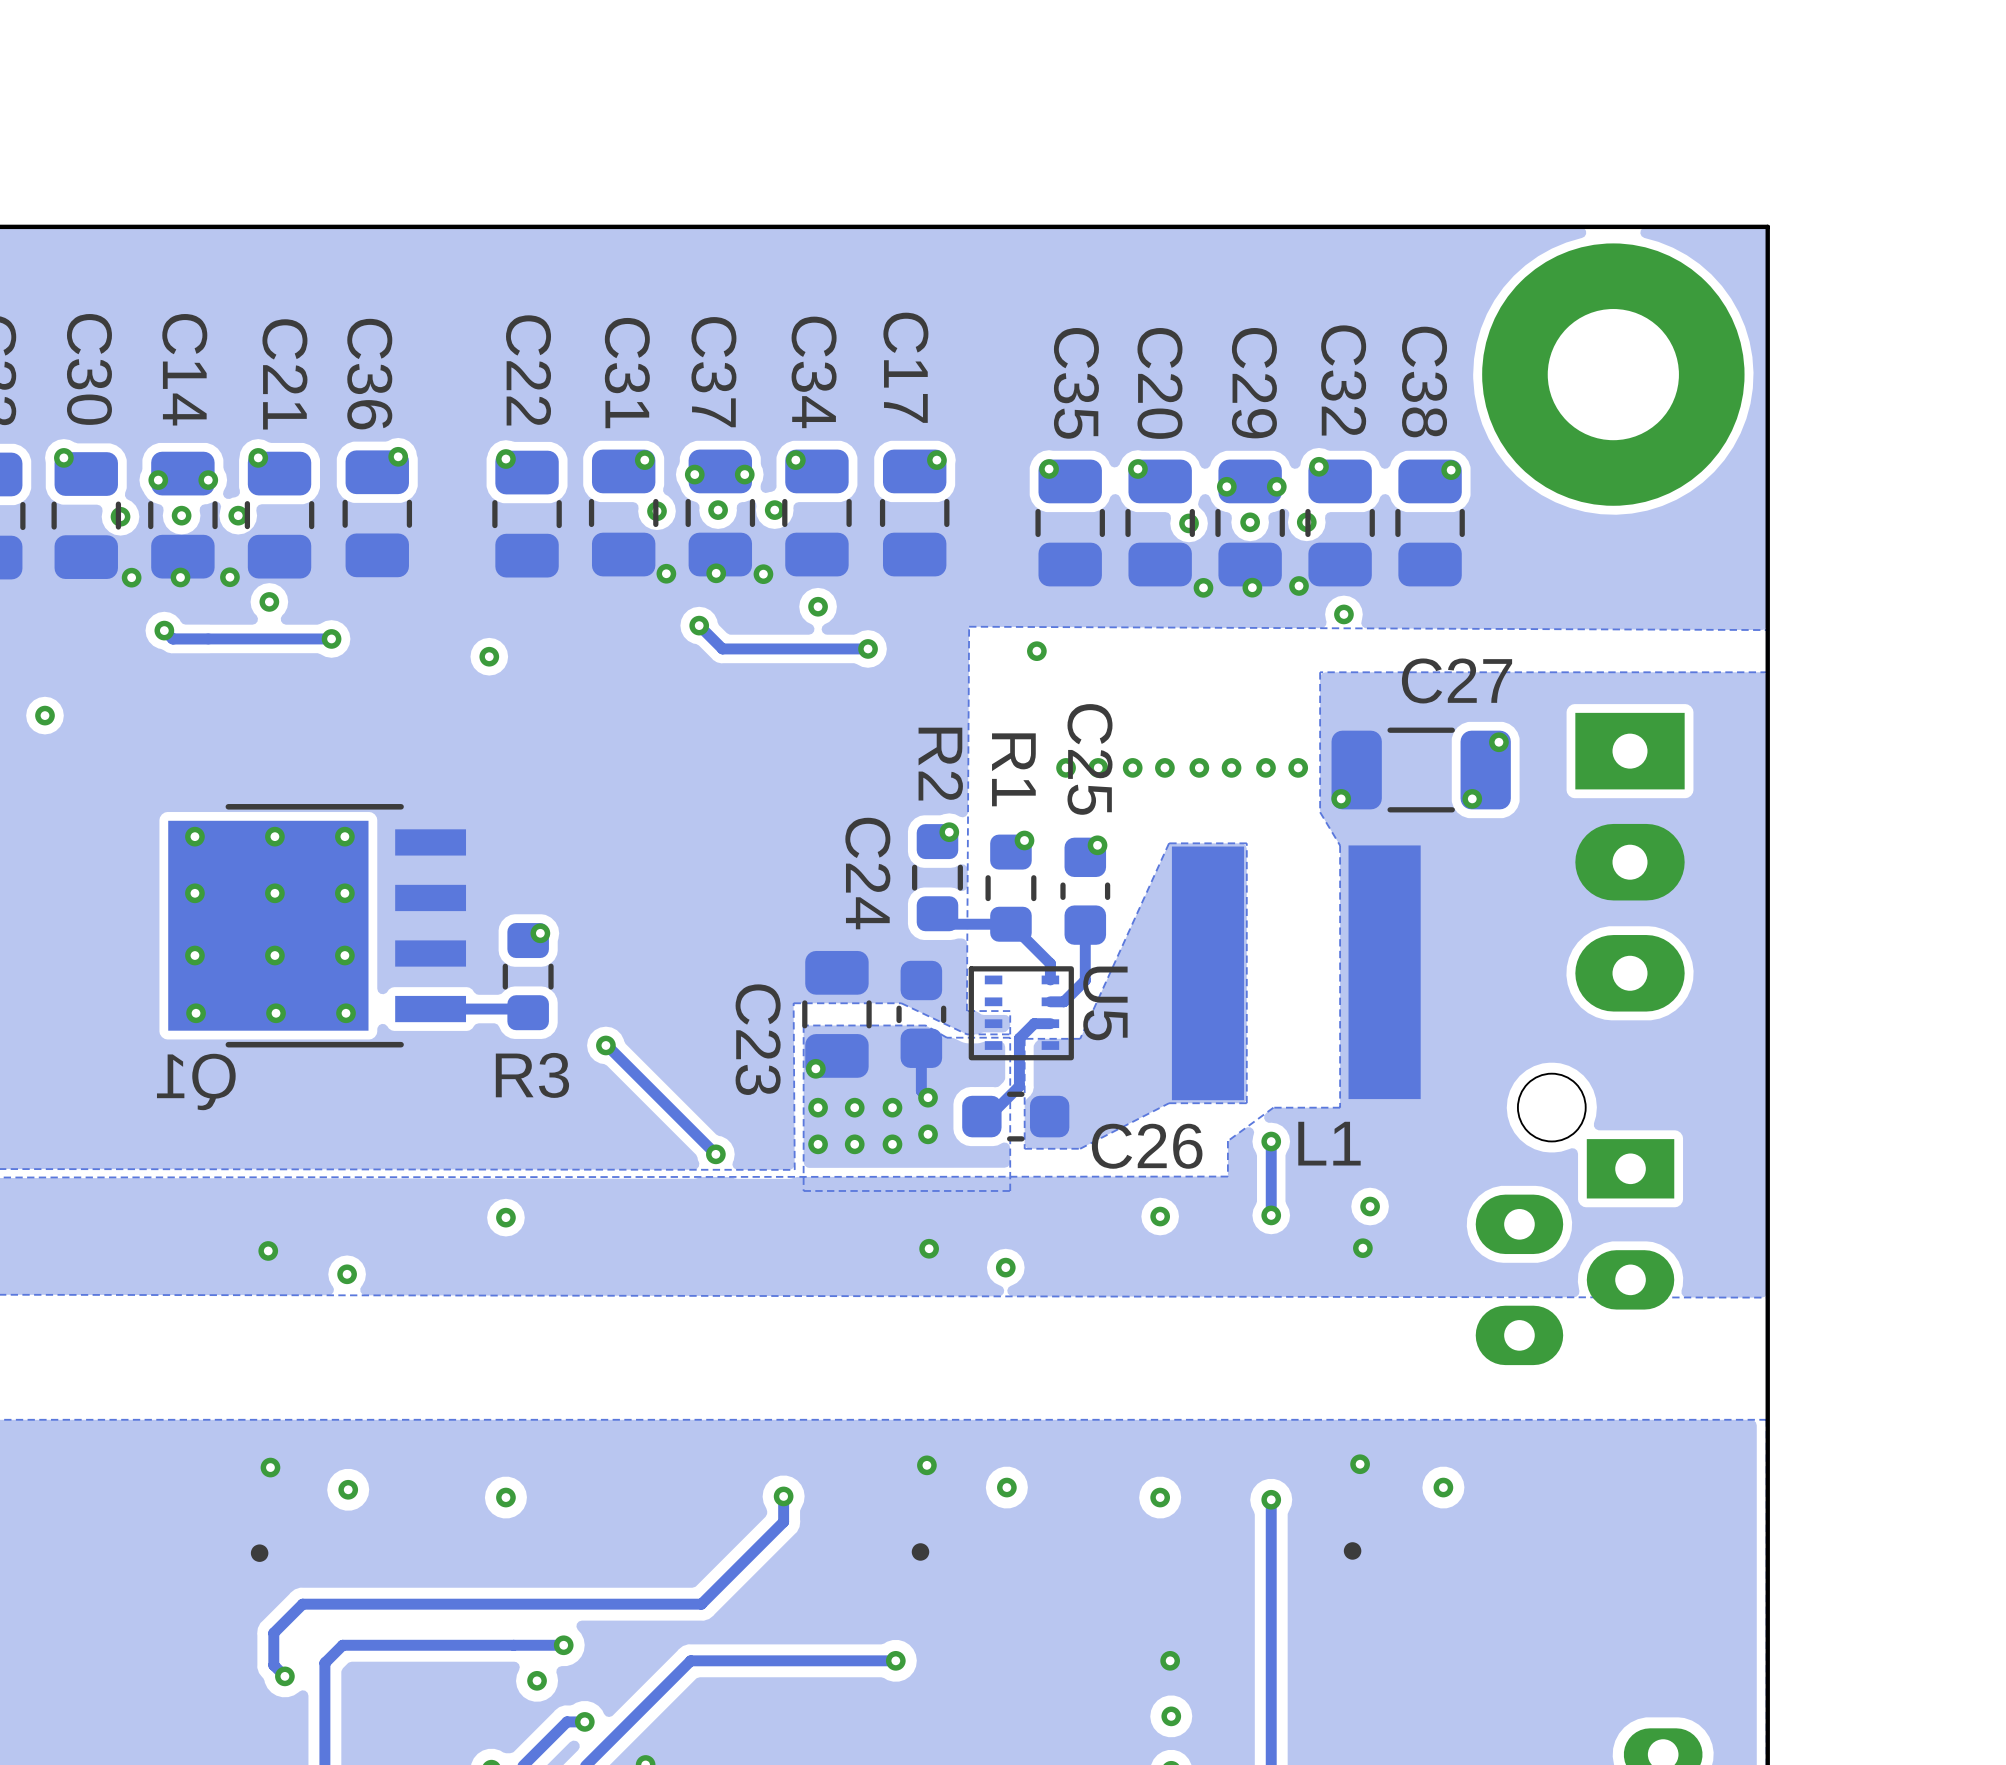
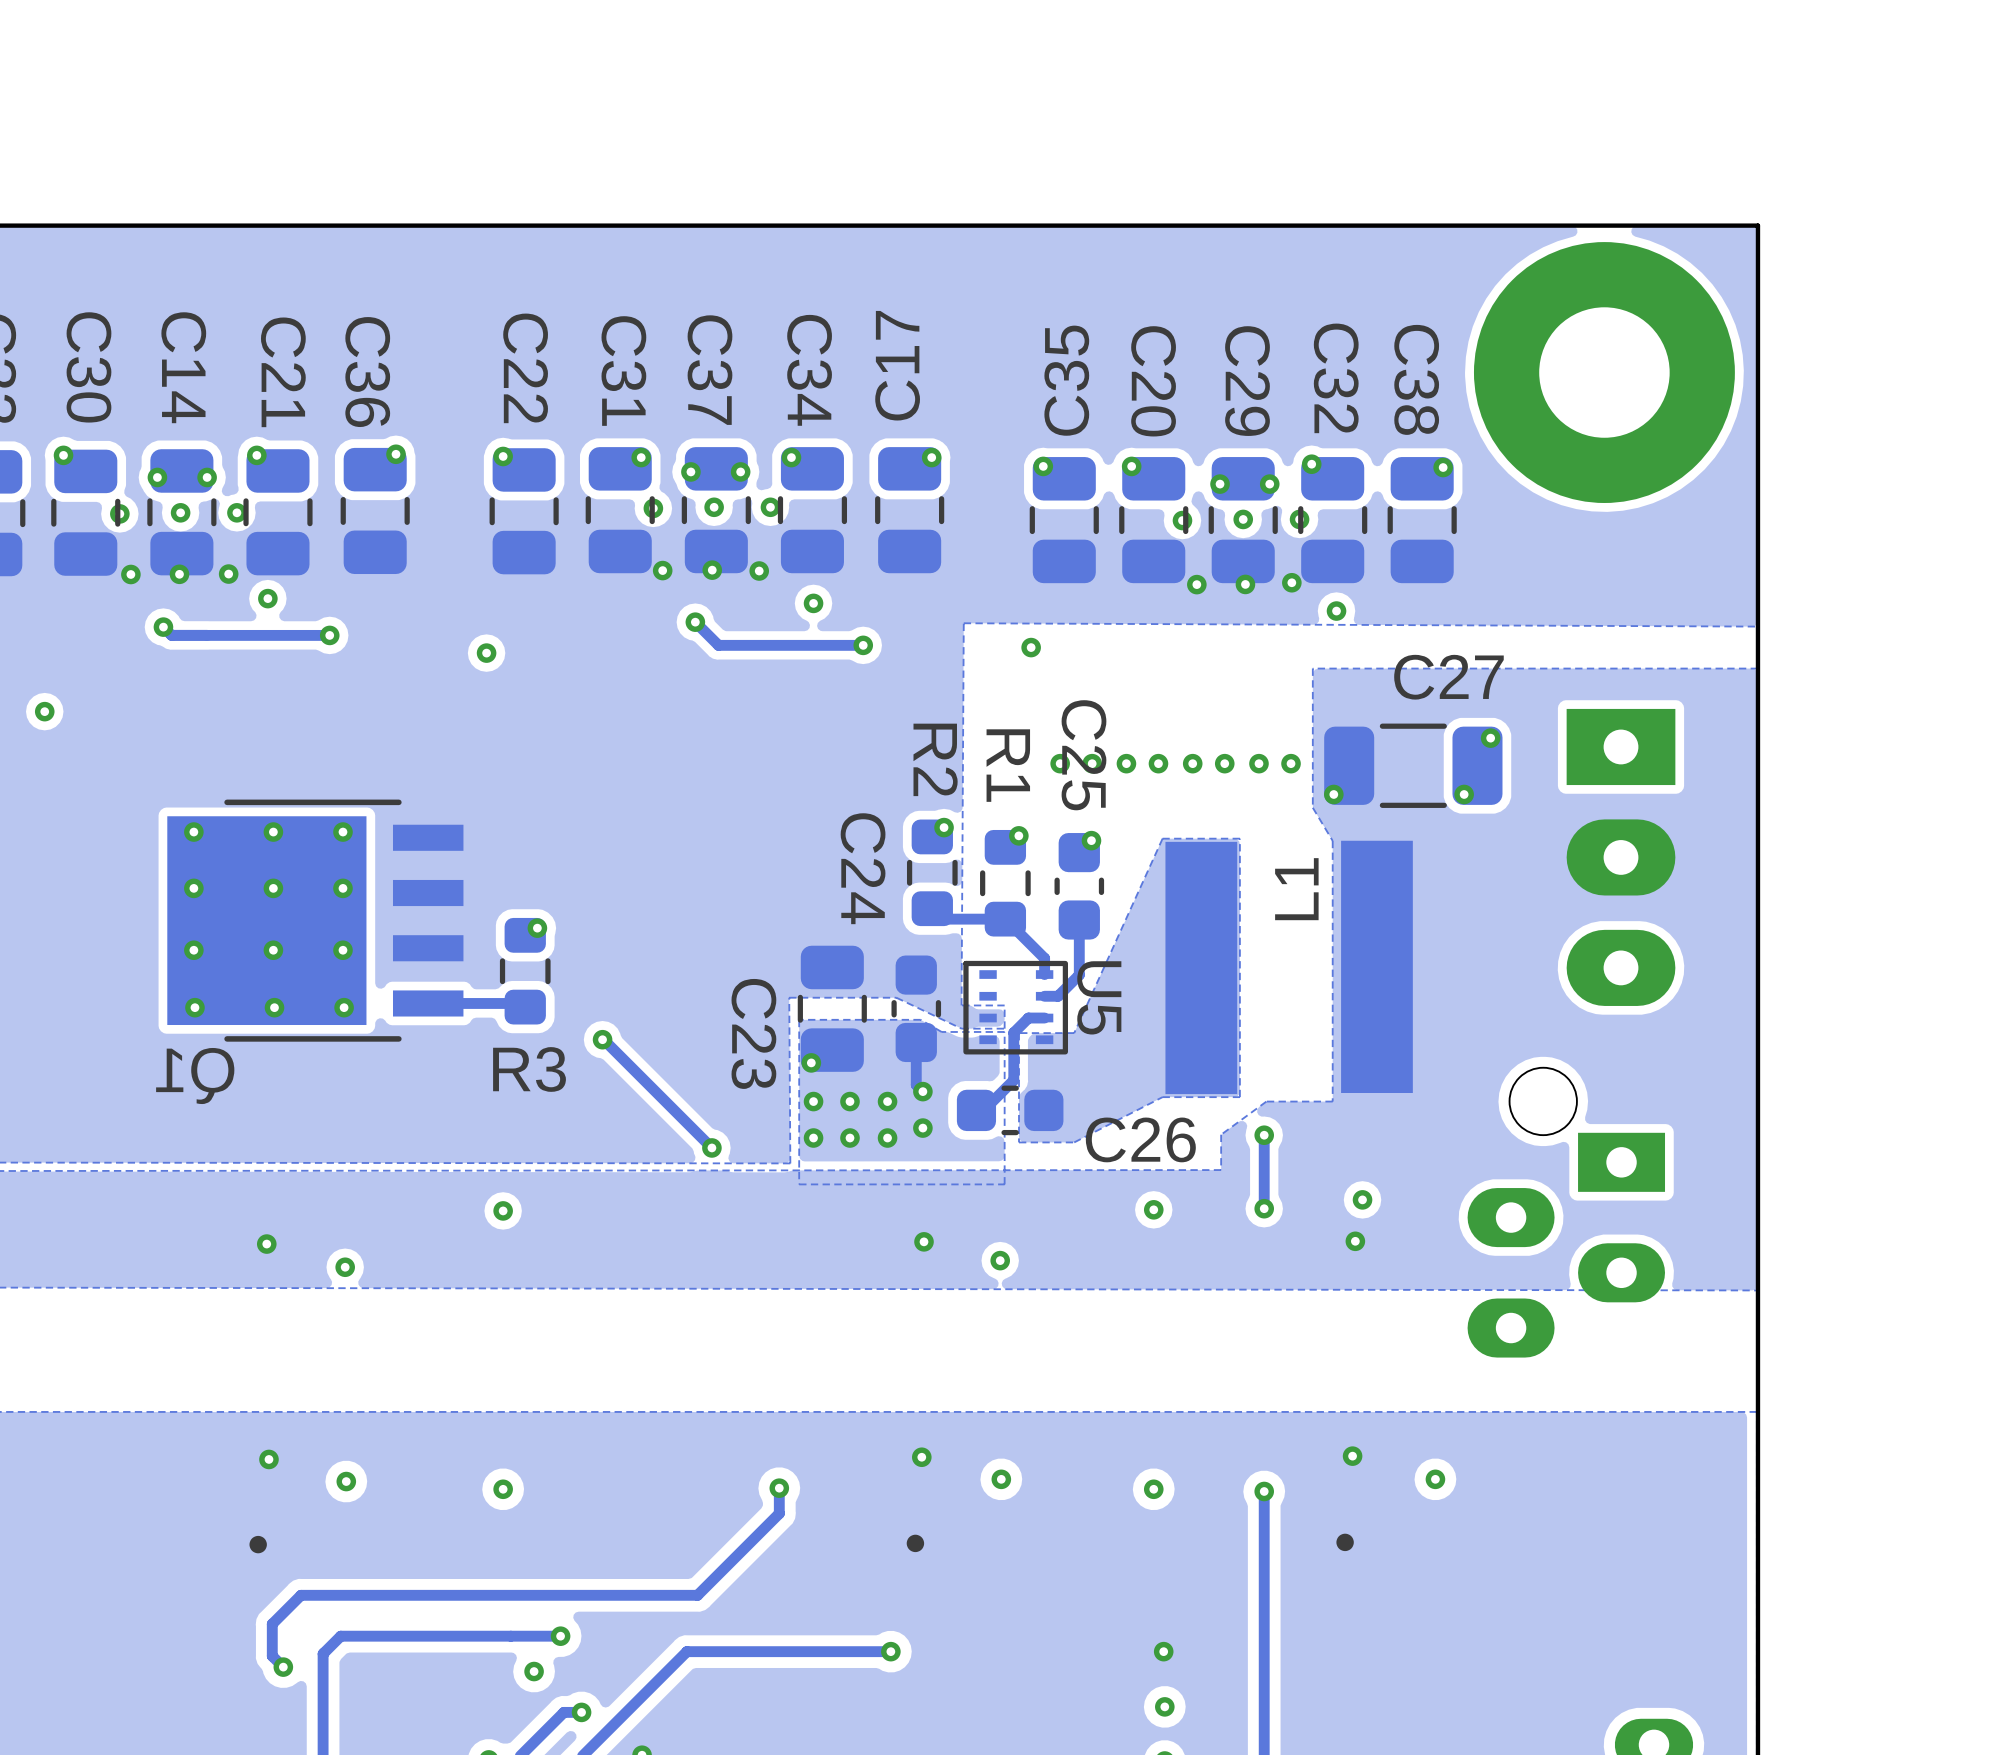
C17 name rotation: 0° (905, 367) -> 180° (897, 365)
C35 name rotation: 0° (1076, 383) -> 180° (1066, 380)
L1 name rotation: 0° (1329, 1143) -> 90° counterclockwise (1296, 889)
L1 name position: L1 (1329, 1143) -> L1 (1296, 889)

